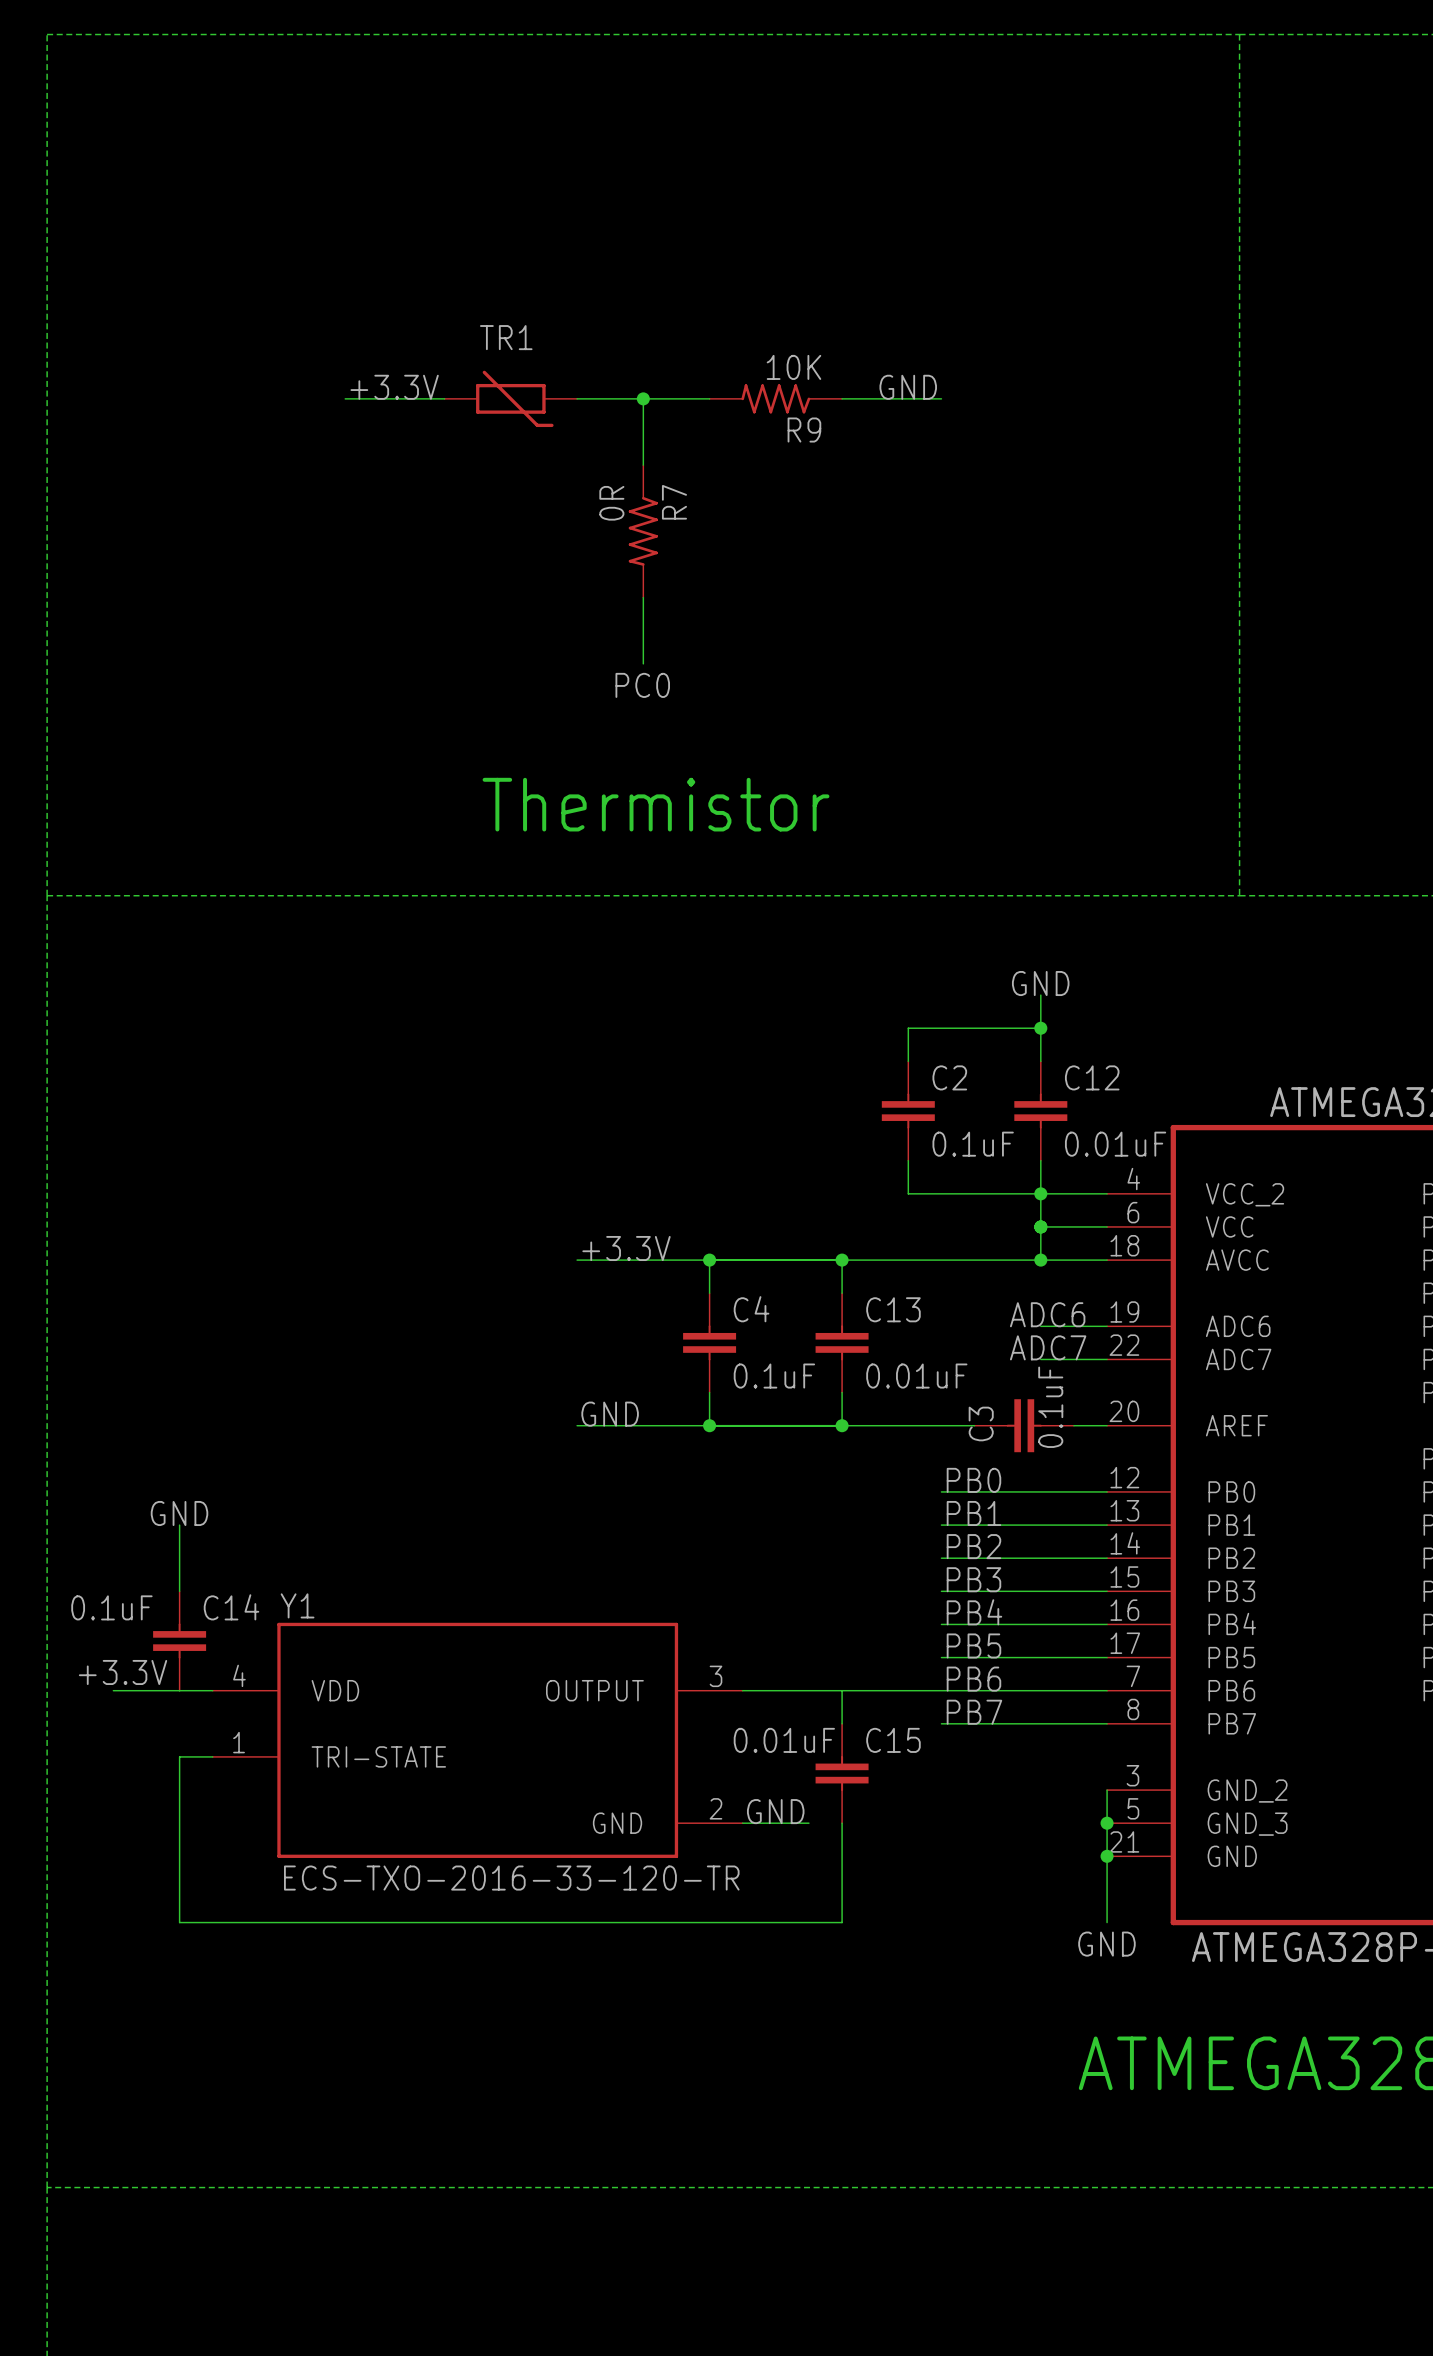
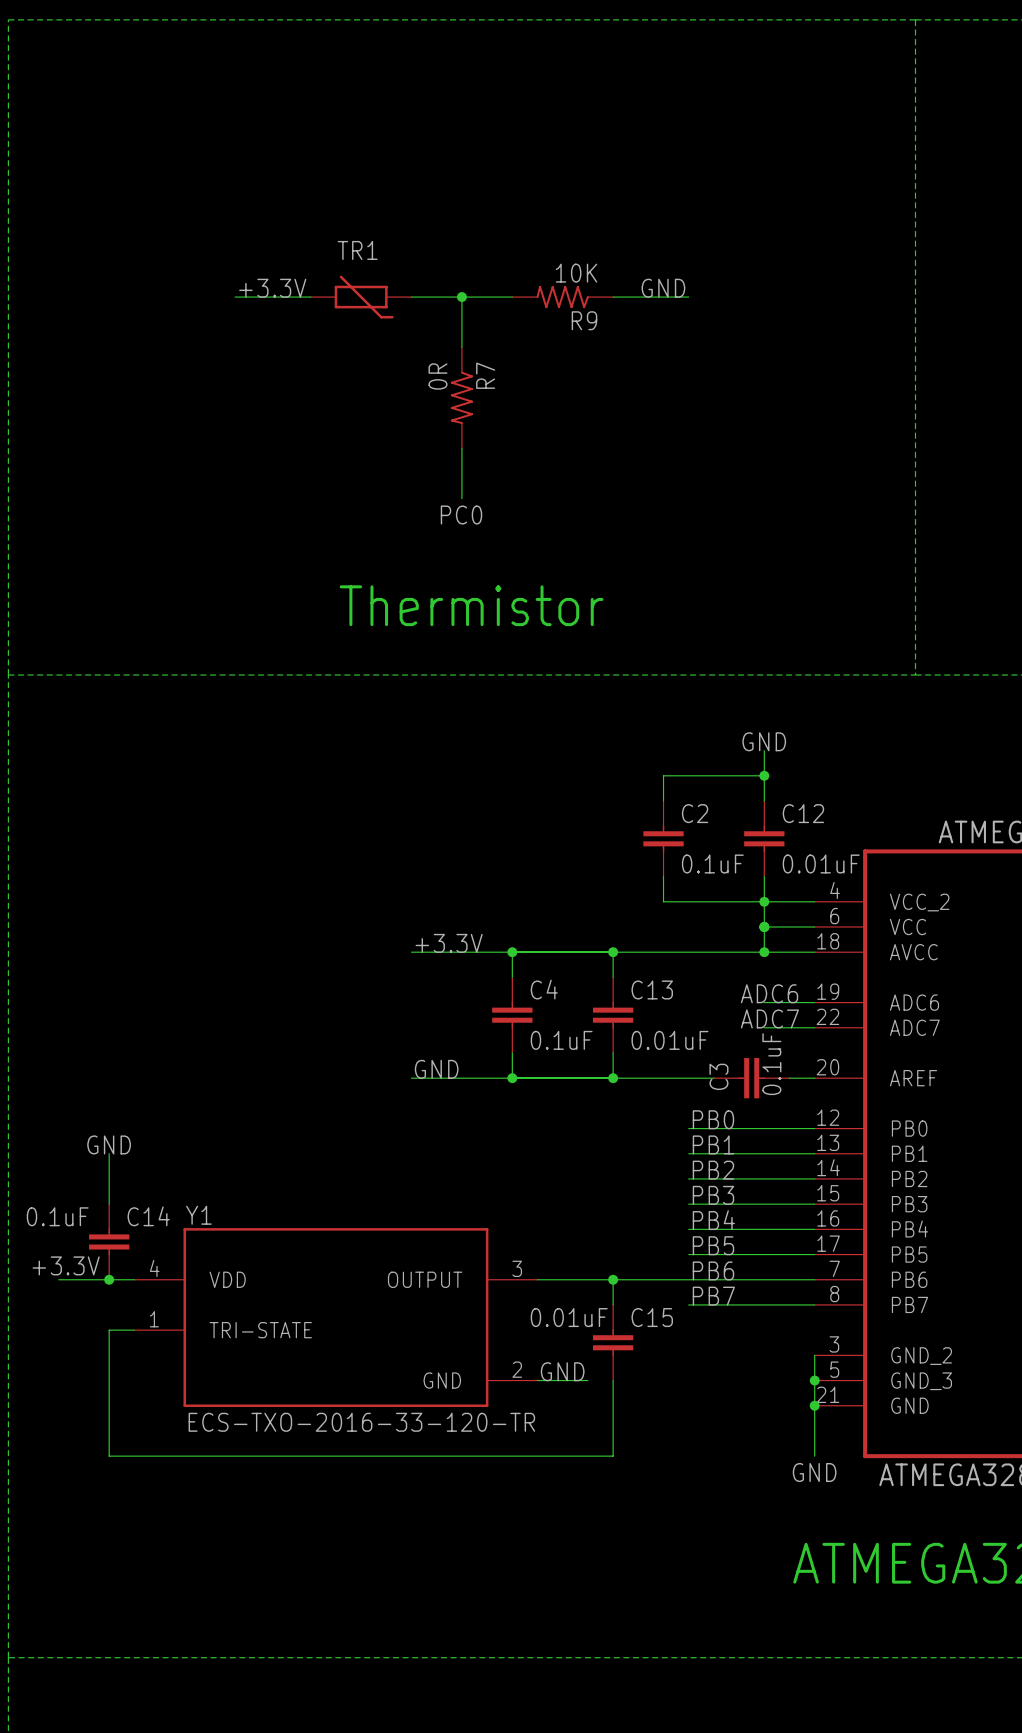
junction: none -> (109, 1279)
junction: none -> (613, 1279)

